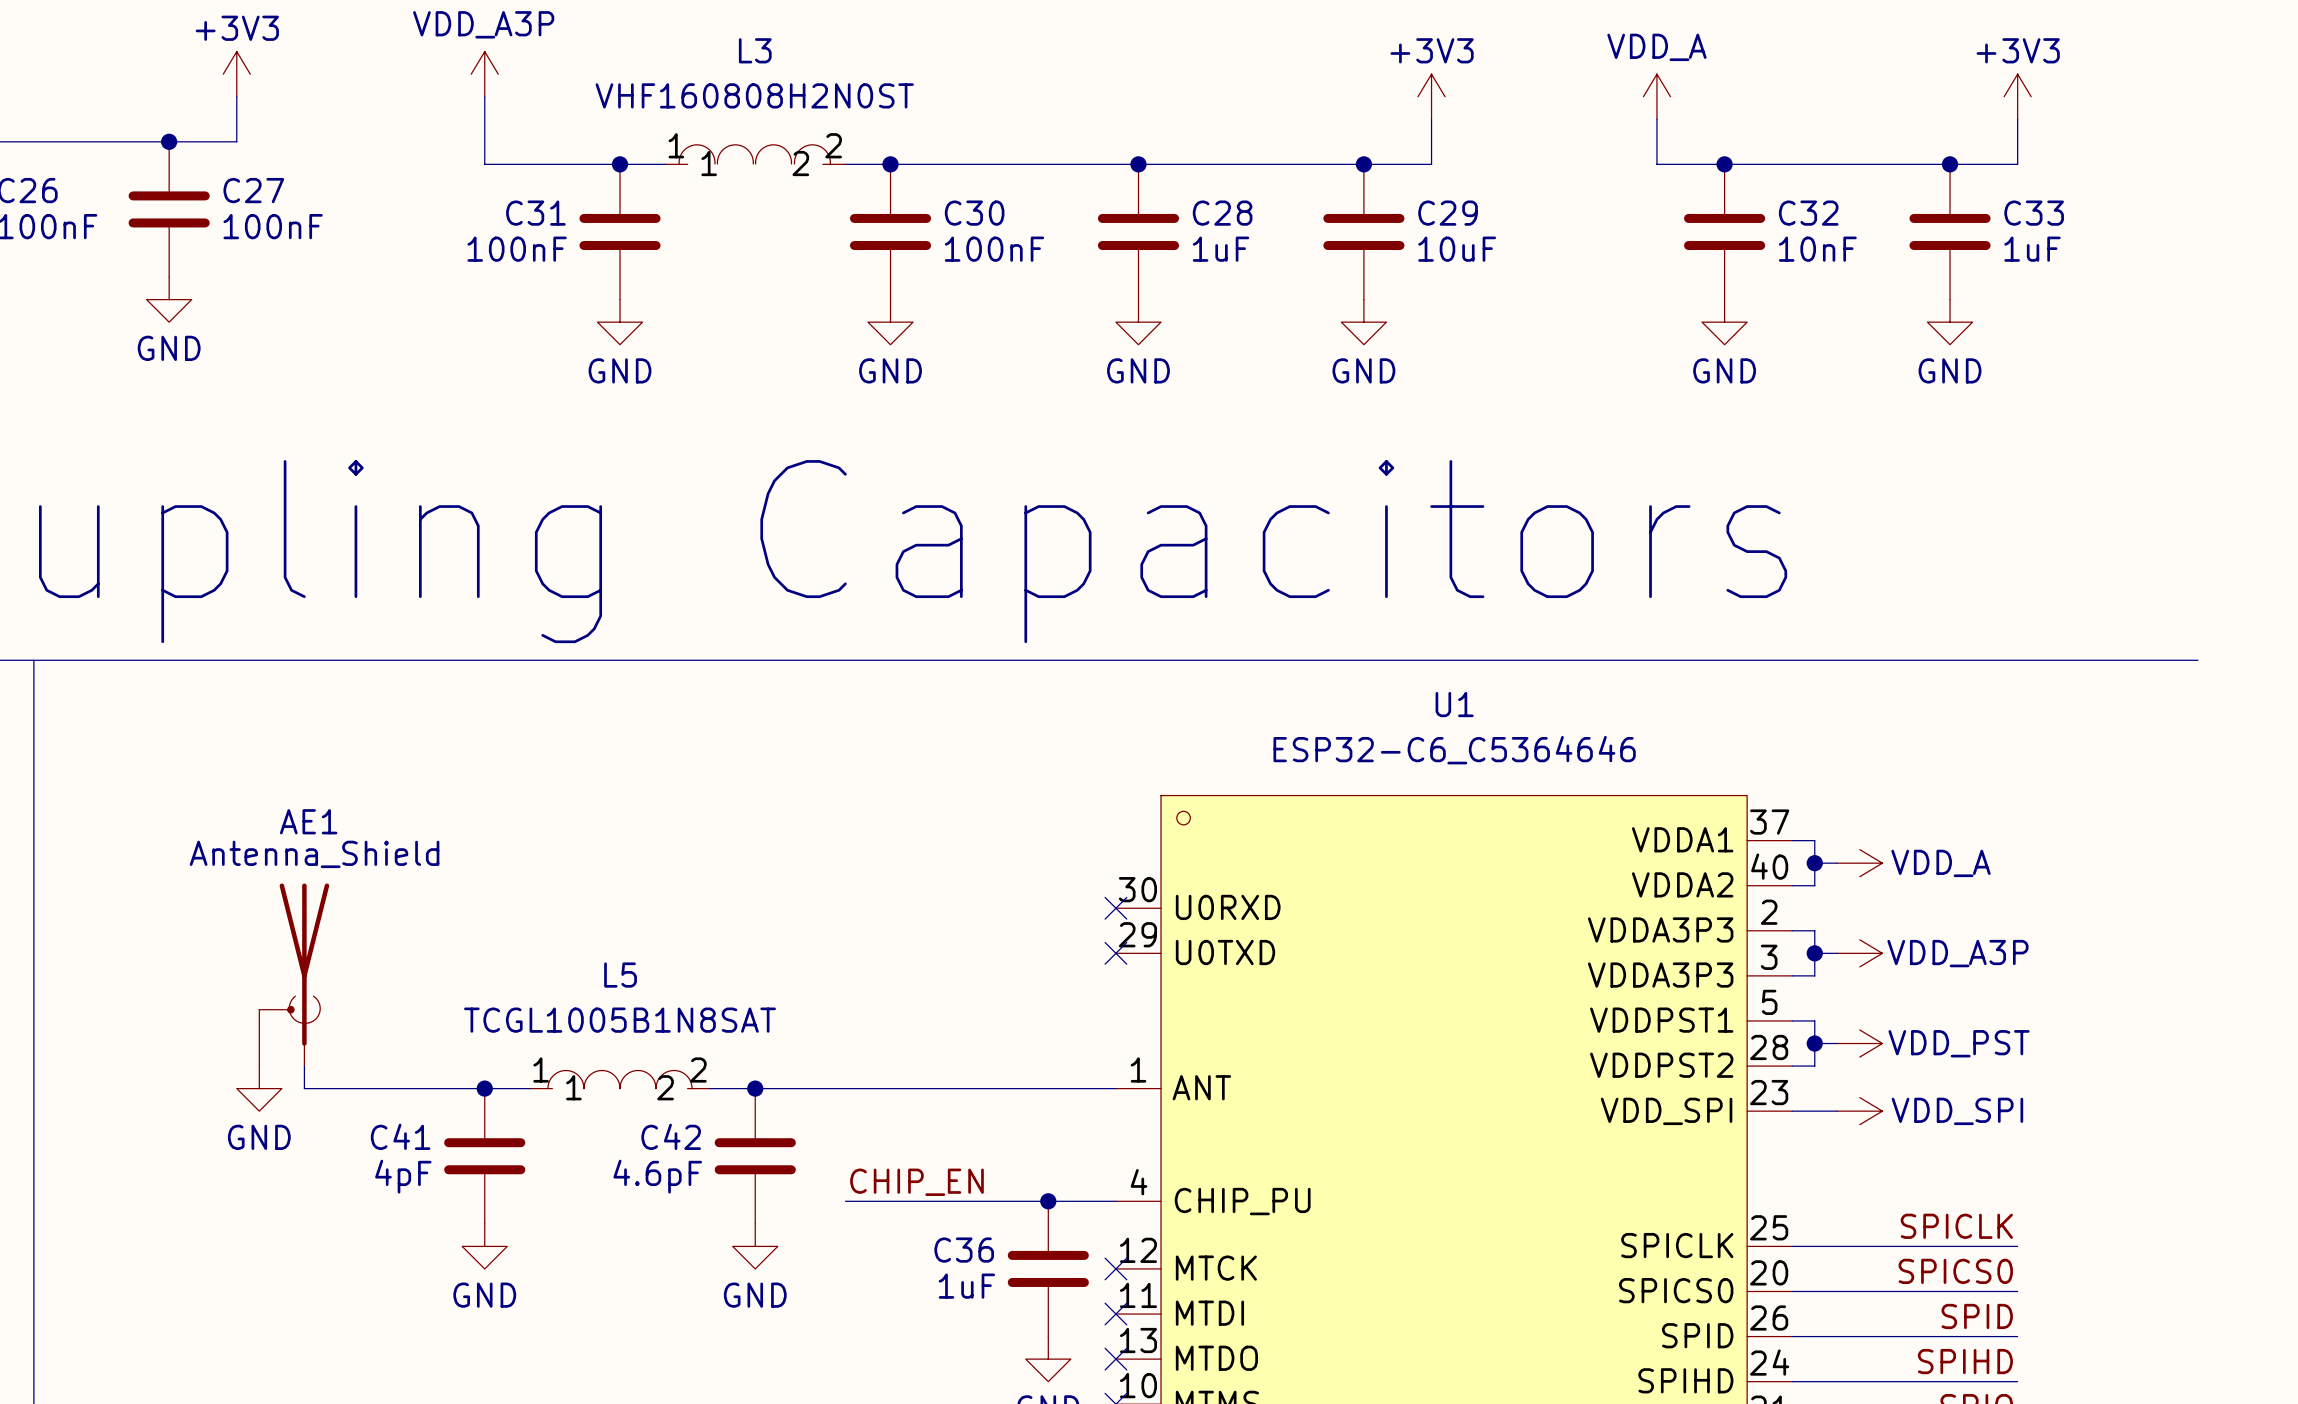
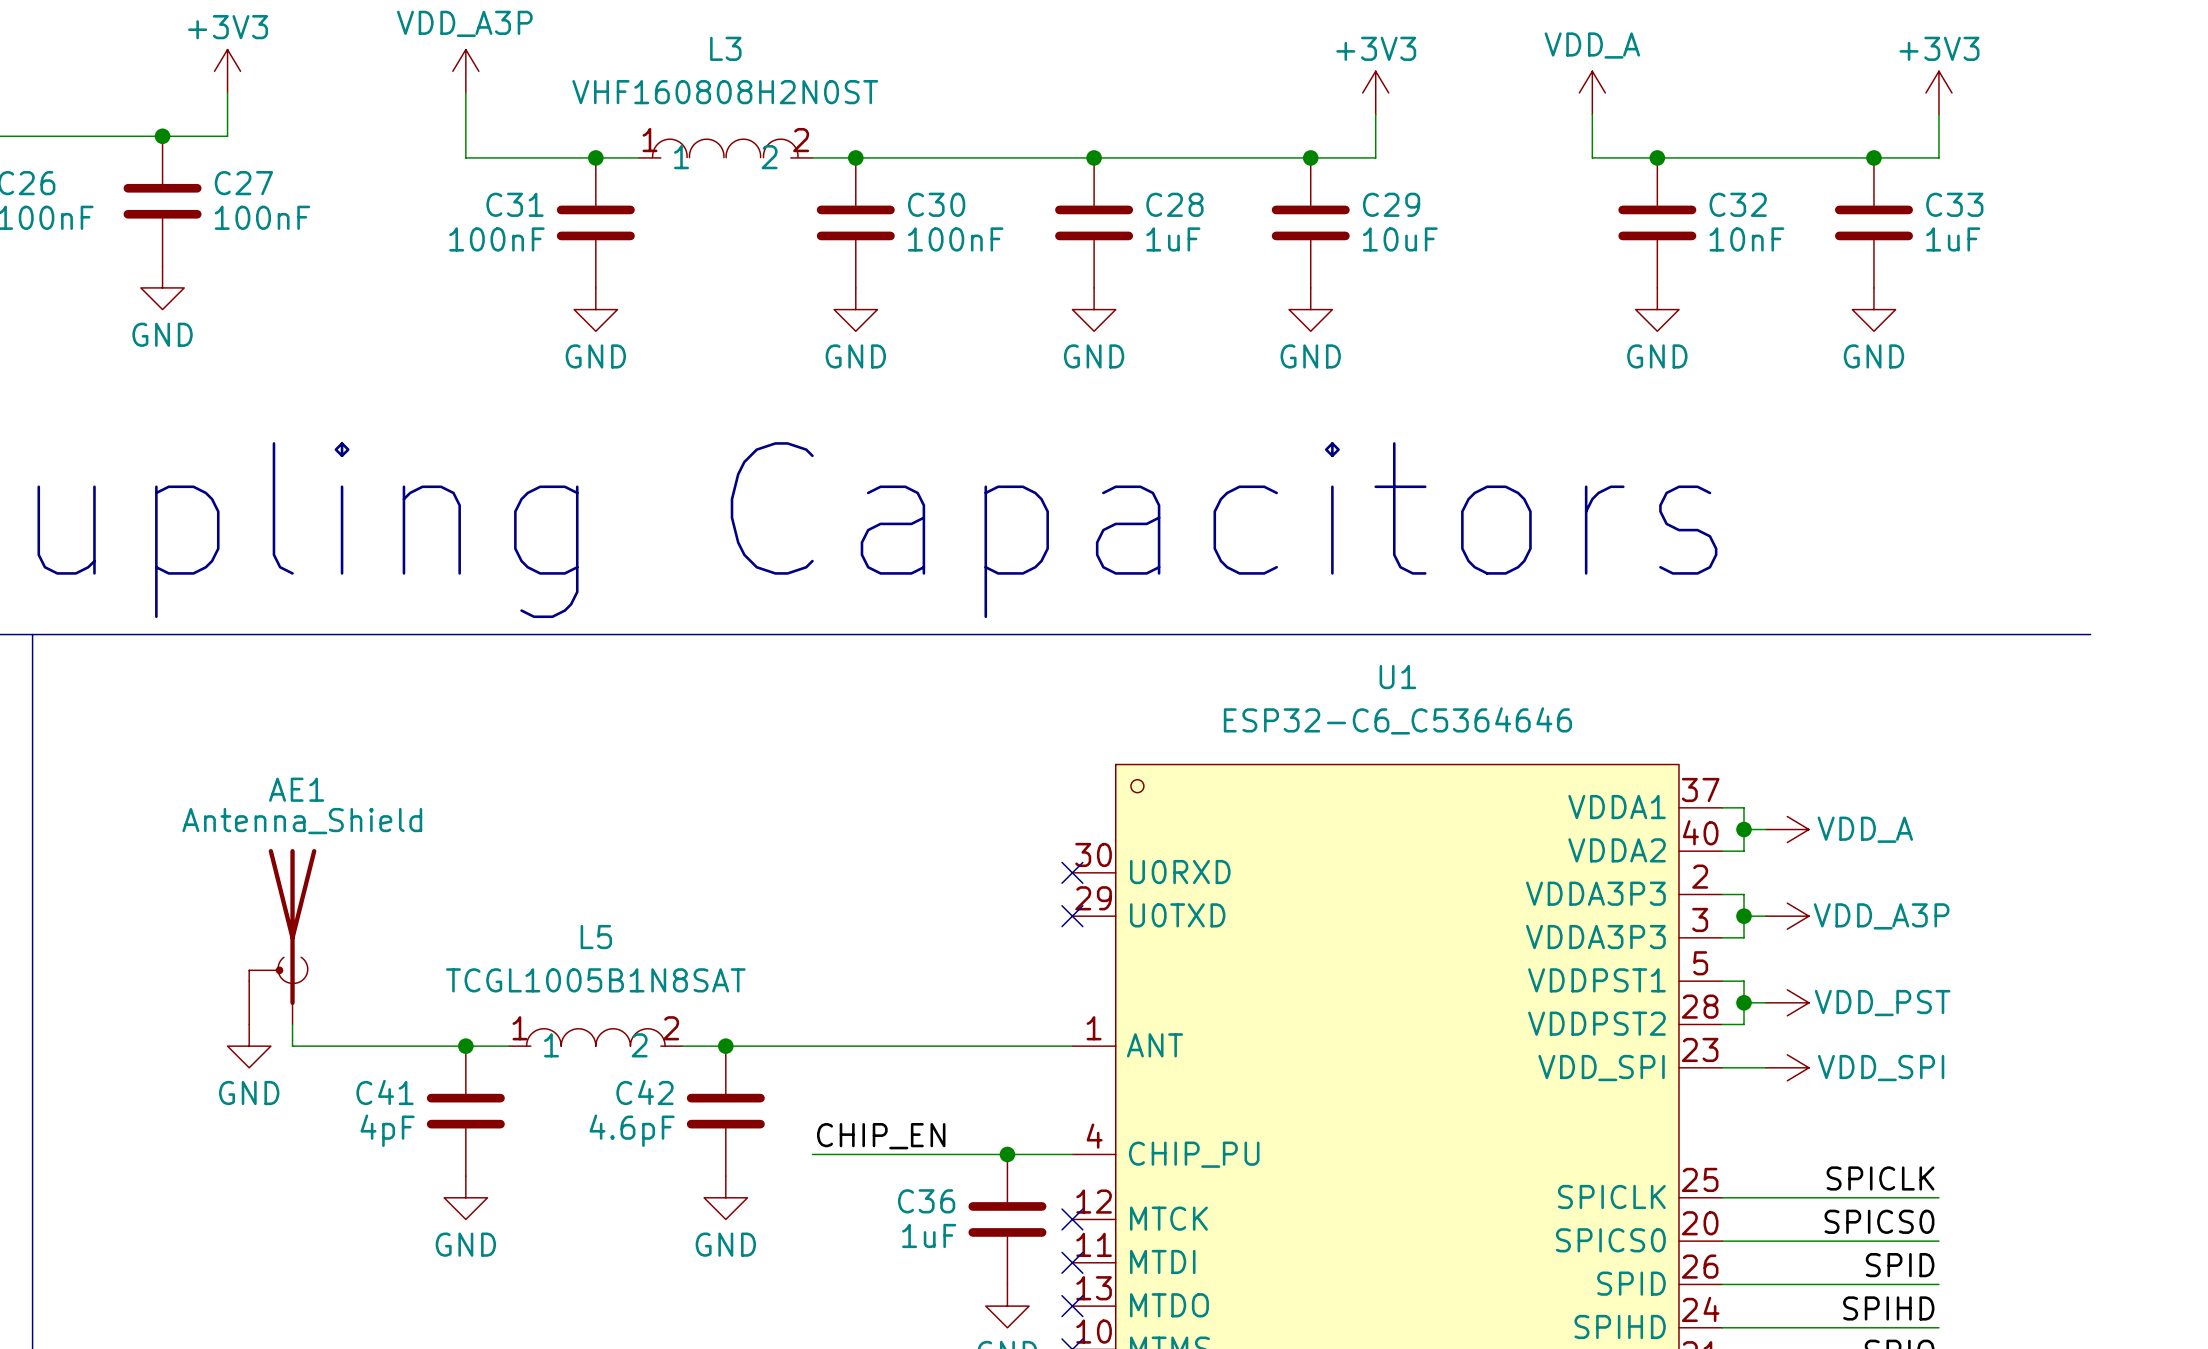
line: (2175, 660) (2197, 660) -> none

